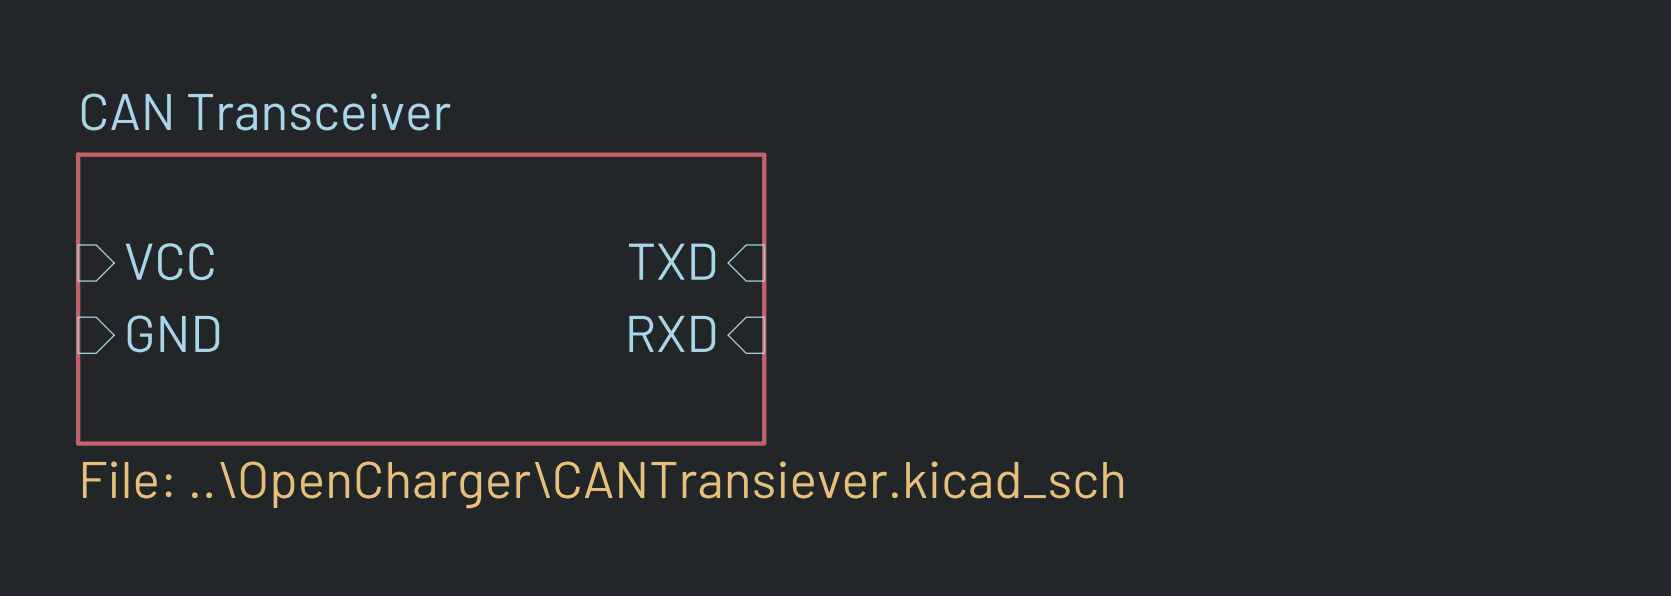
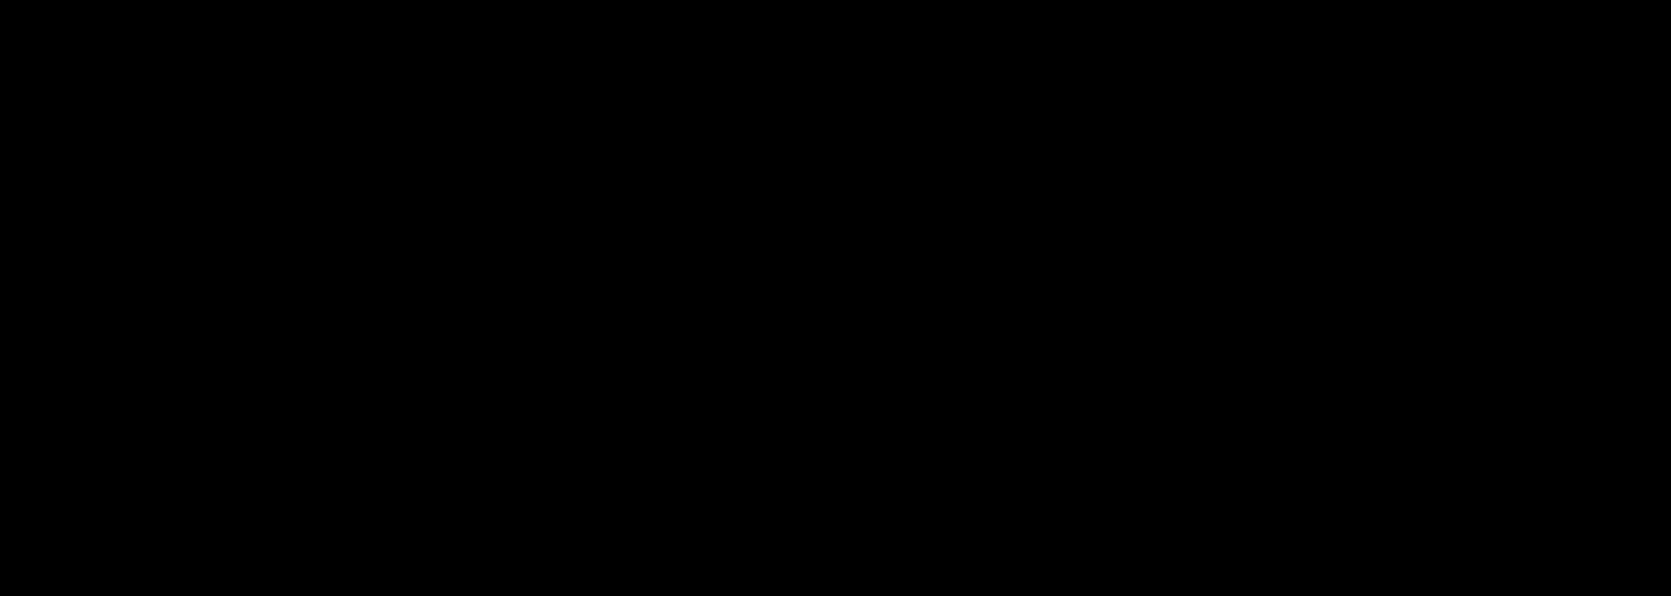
sheet pin: VCC (169, 261) -> none
sheet pin: TXD (672, 261) -> none
sheet CAN Transceiver: File: ..\OpenCharger\CANTransiever.kicad_sch (421, 299) -> none
sheet pin: GND (173, 333) -> none
sheet pin: RXD (672, 333) -> none

